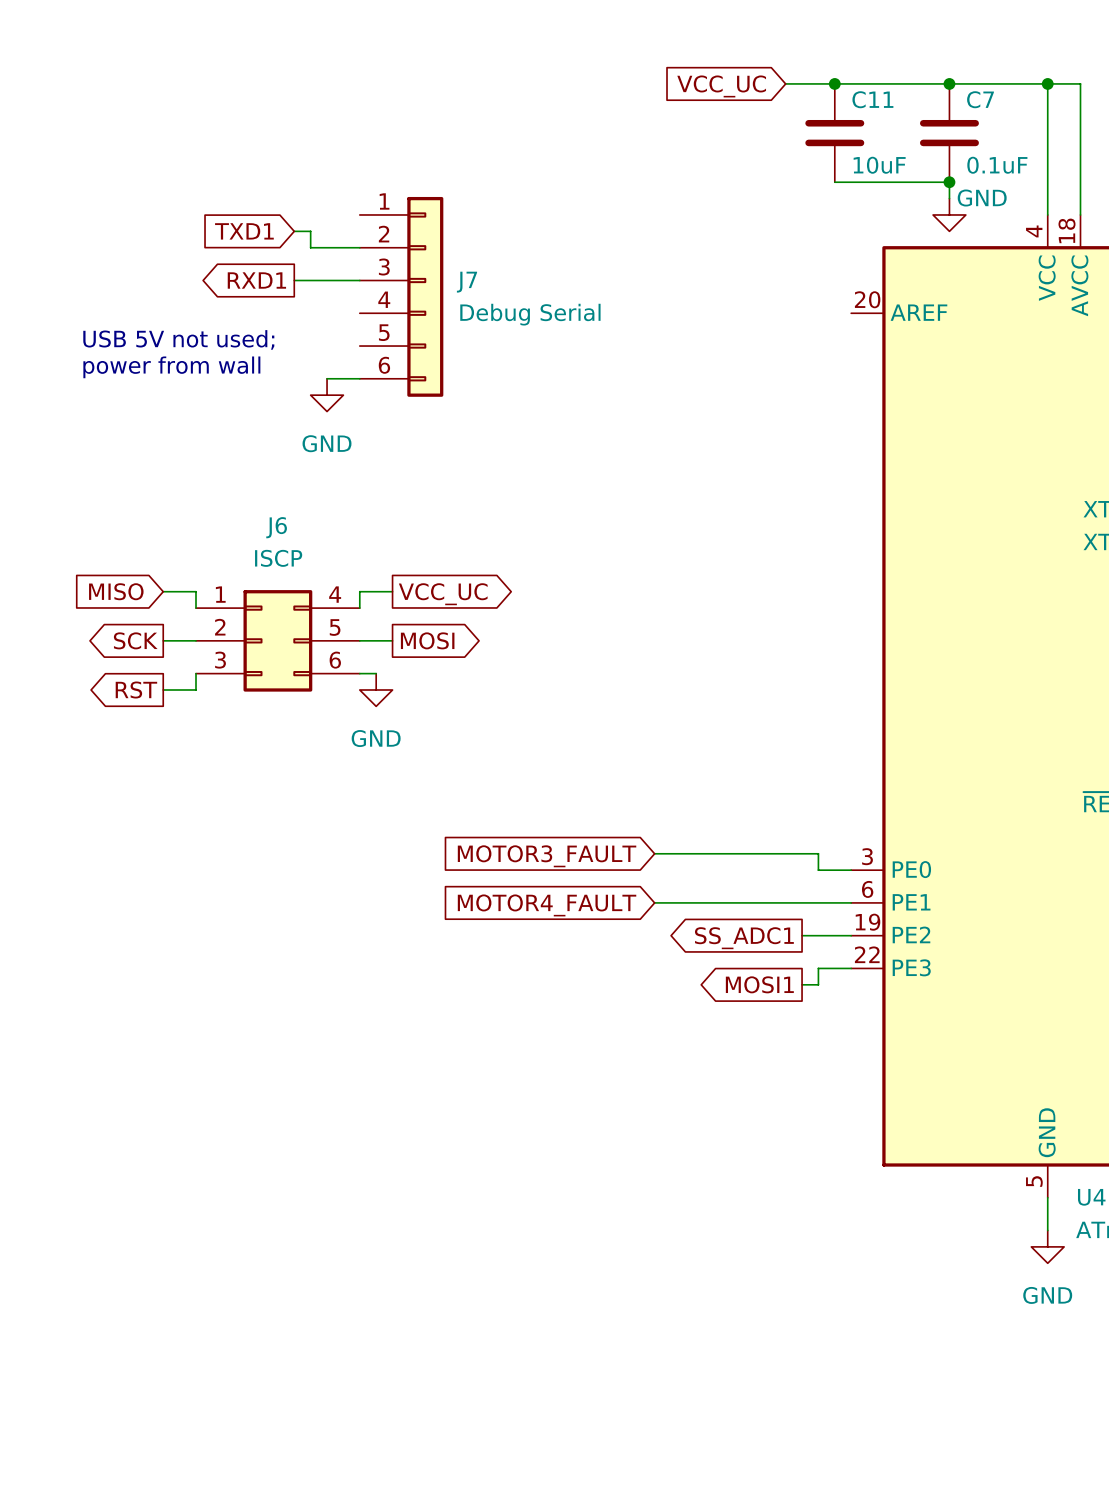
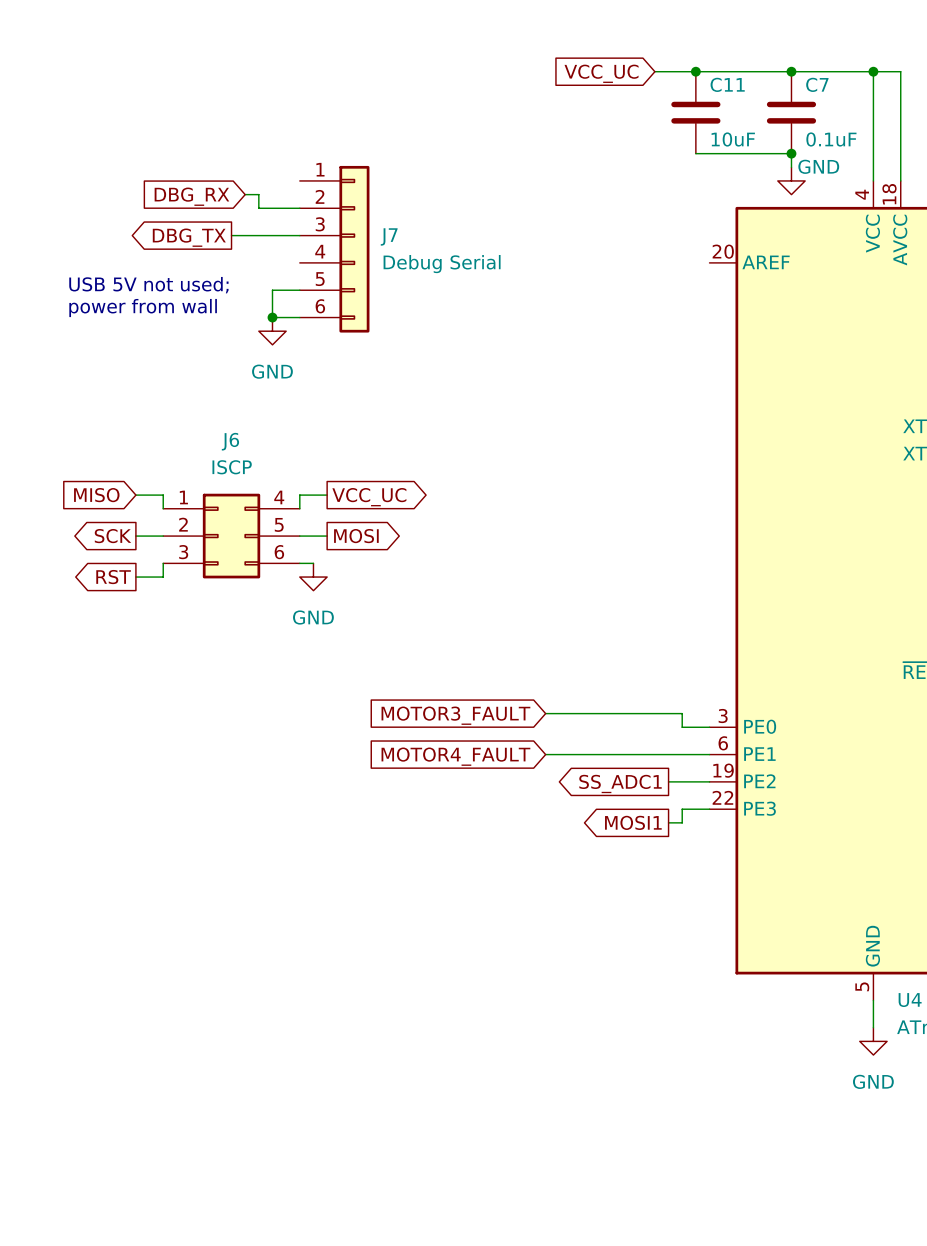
global label: TXD1 (244, 231) -> DBG_RX (191, 196)
global label: RXD1 (256, 280) -> none
wire: none -> (231, 235) (245, 235)
global label: none -> DBG_TX (189, 237)
wire: none -> (299, 290) (272, 290) (272, 317)
junction: none -> (272, 317)

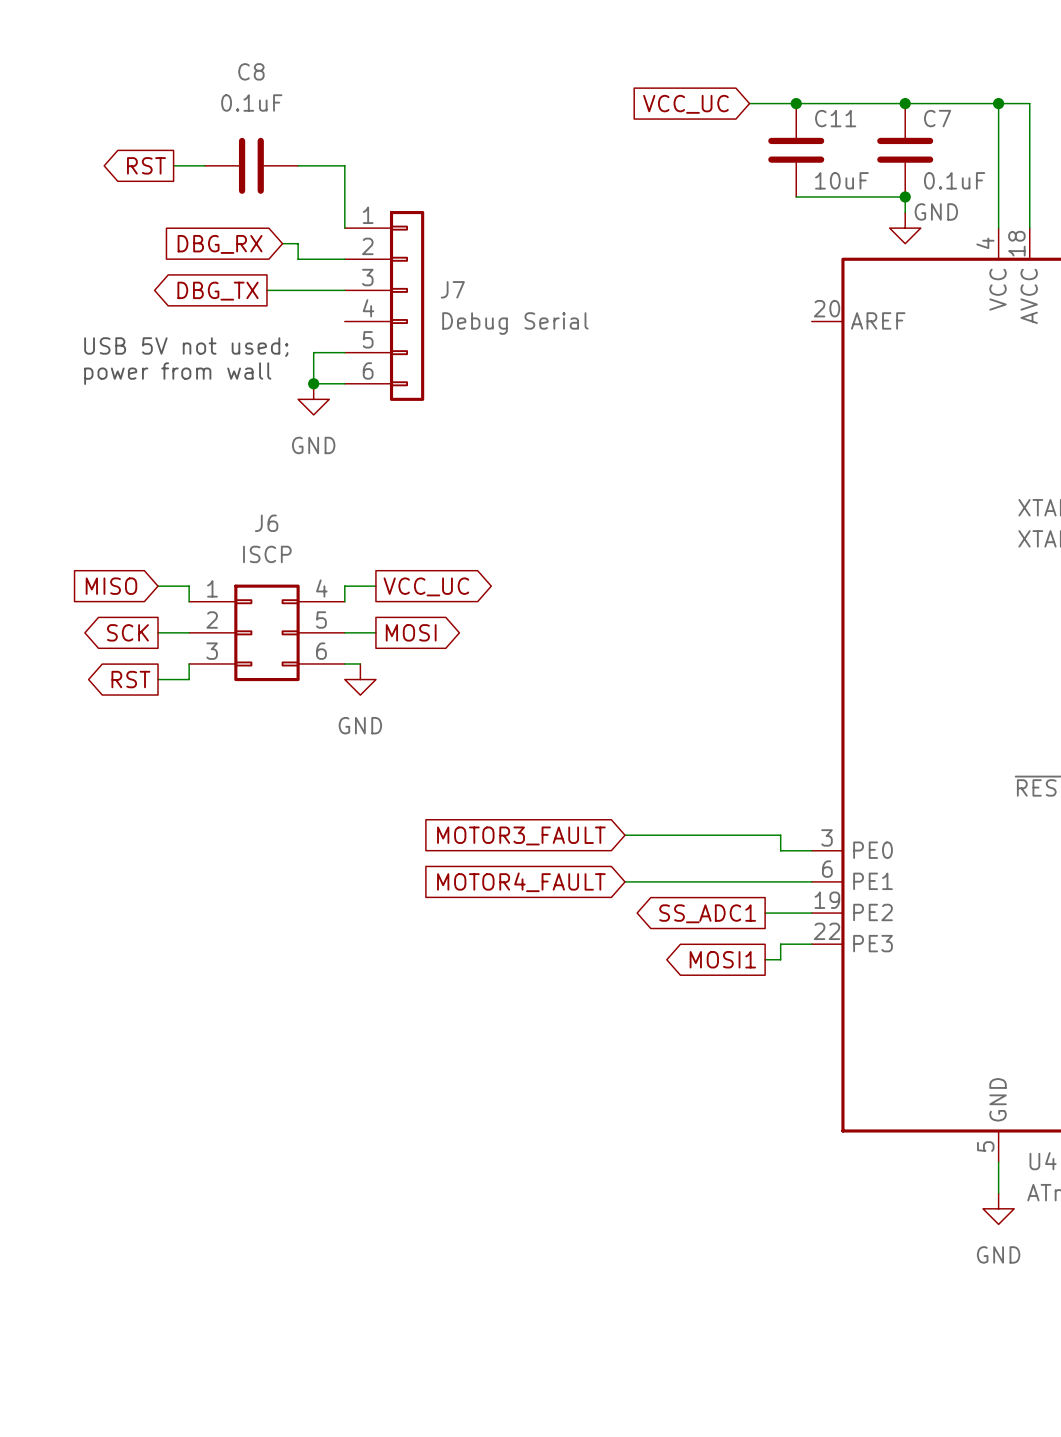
global label: none -> RST (146, 165)
wire: none -> (173, 165) (204, 165)
C8: none -> 0.1uF (251, 165)
wire: none -> (298, 165) (344, 165) (344, 228)

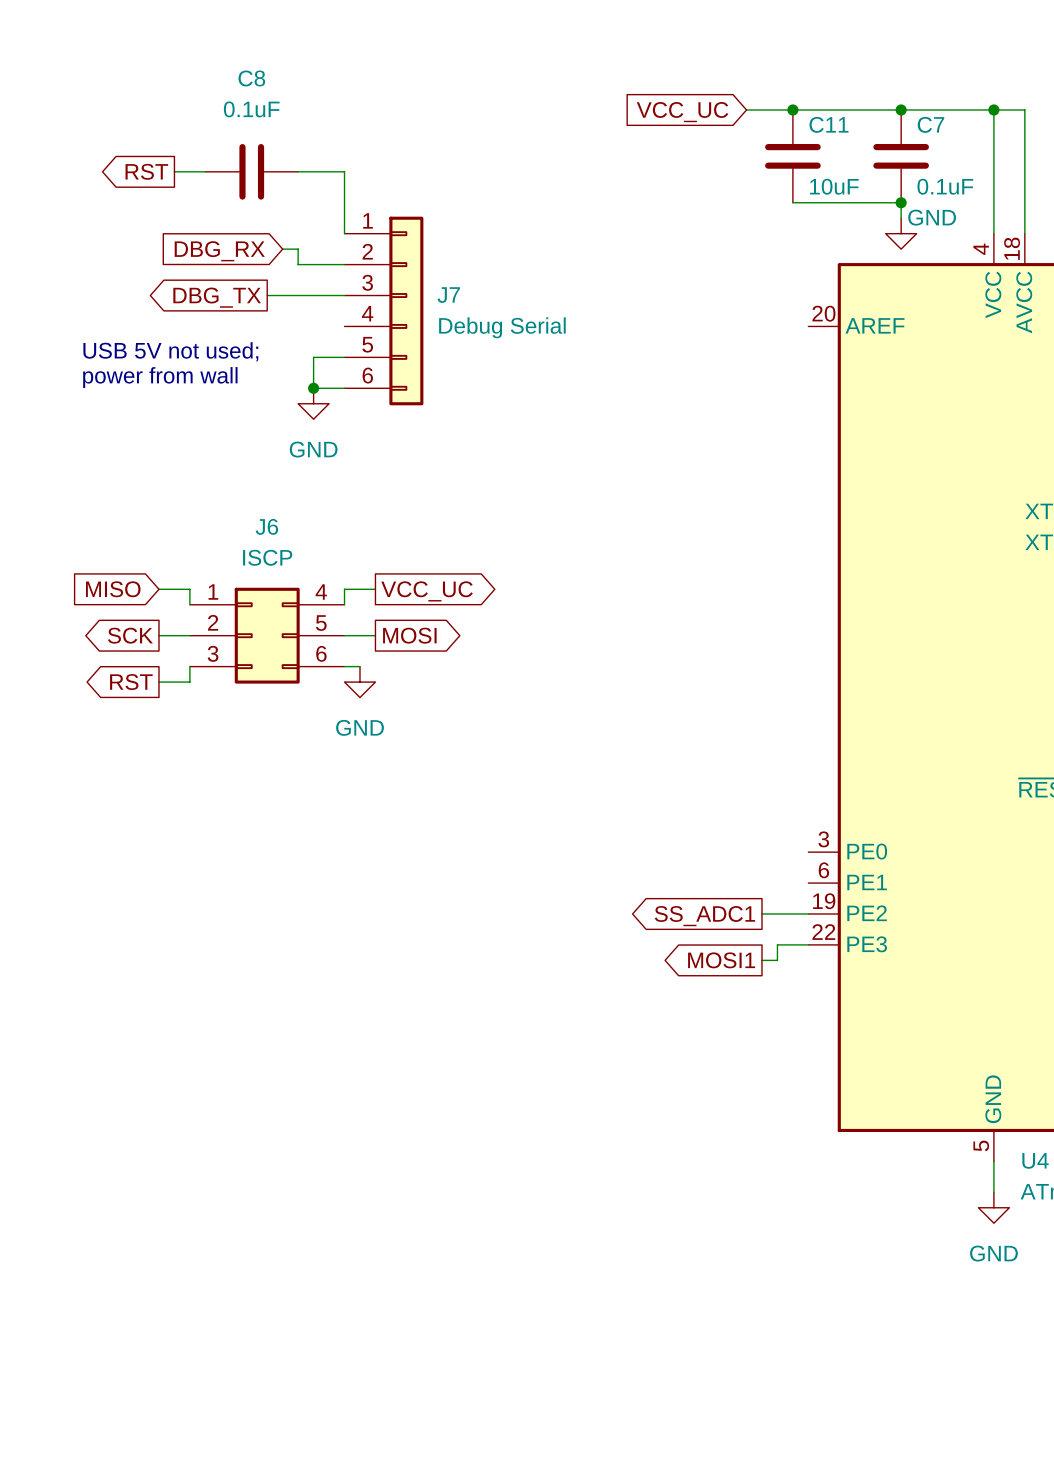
global label: MOTOR3_FAULT (521, 835) -> none
wire: (625, 835) (780, 835) (780, 850) (811, 850) -> none
wire: (625, 881) (811, 881) -> none
global label: MOTOR4_FAULT (521, 882) -> none

